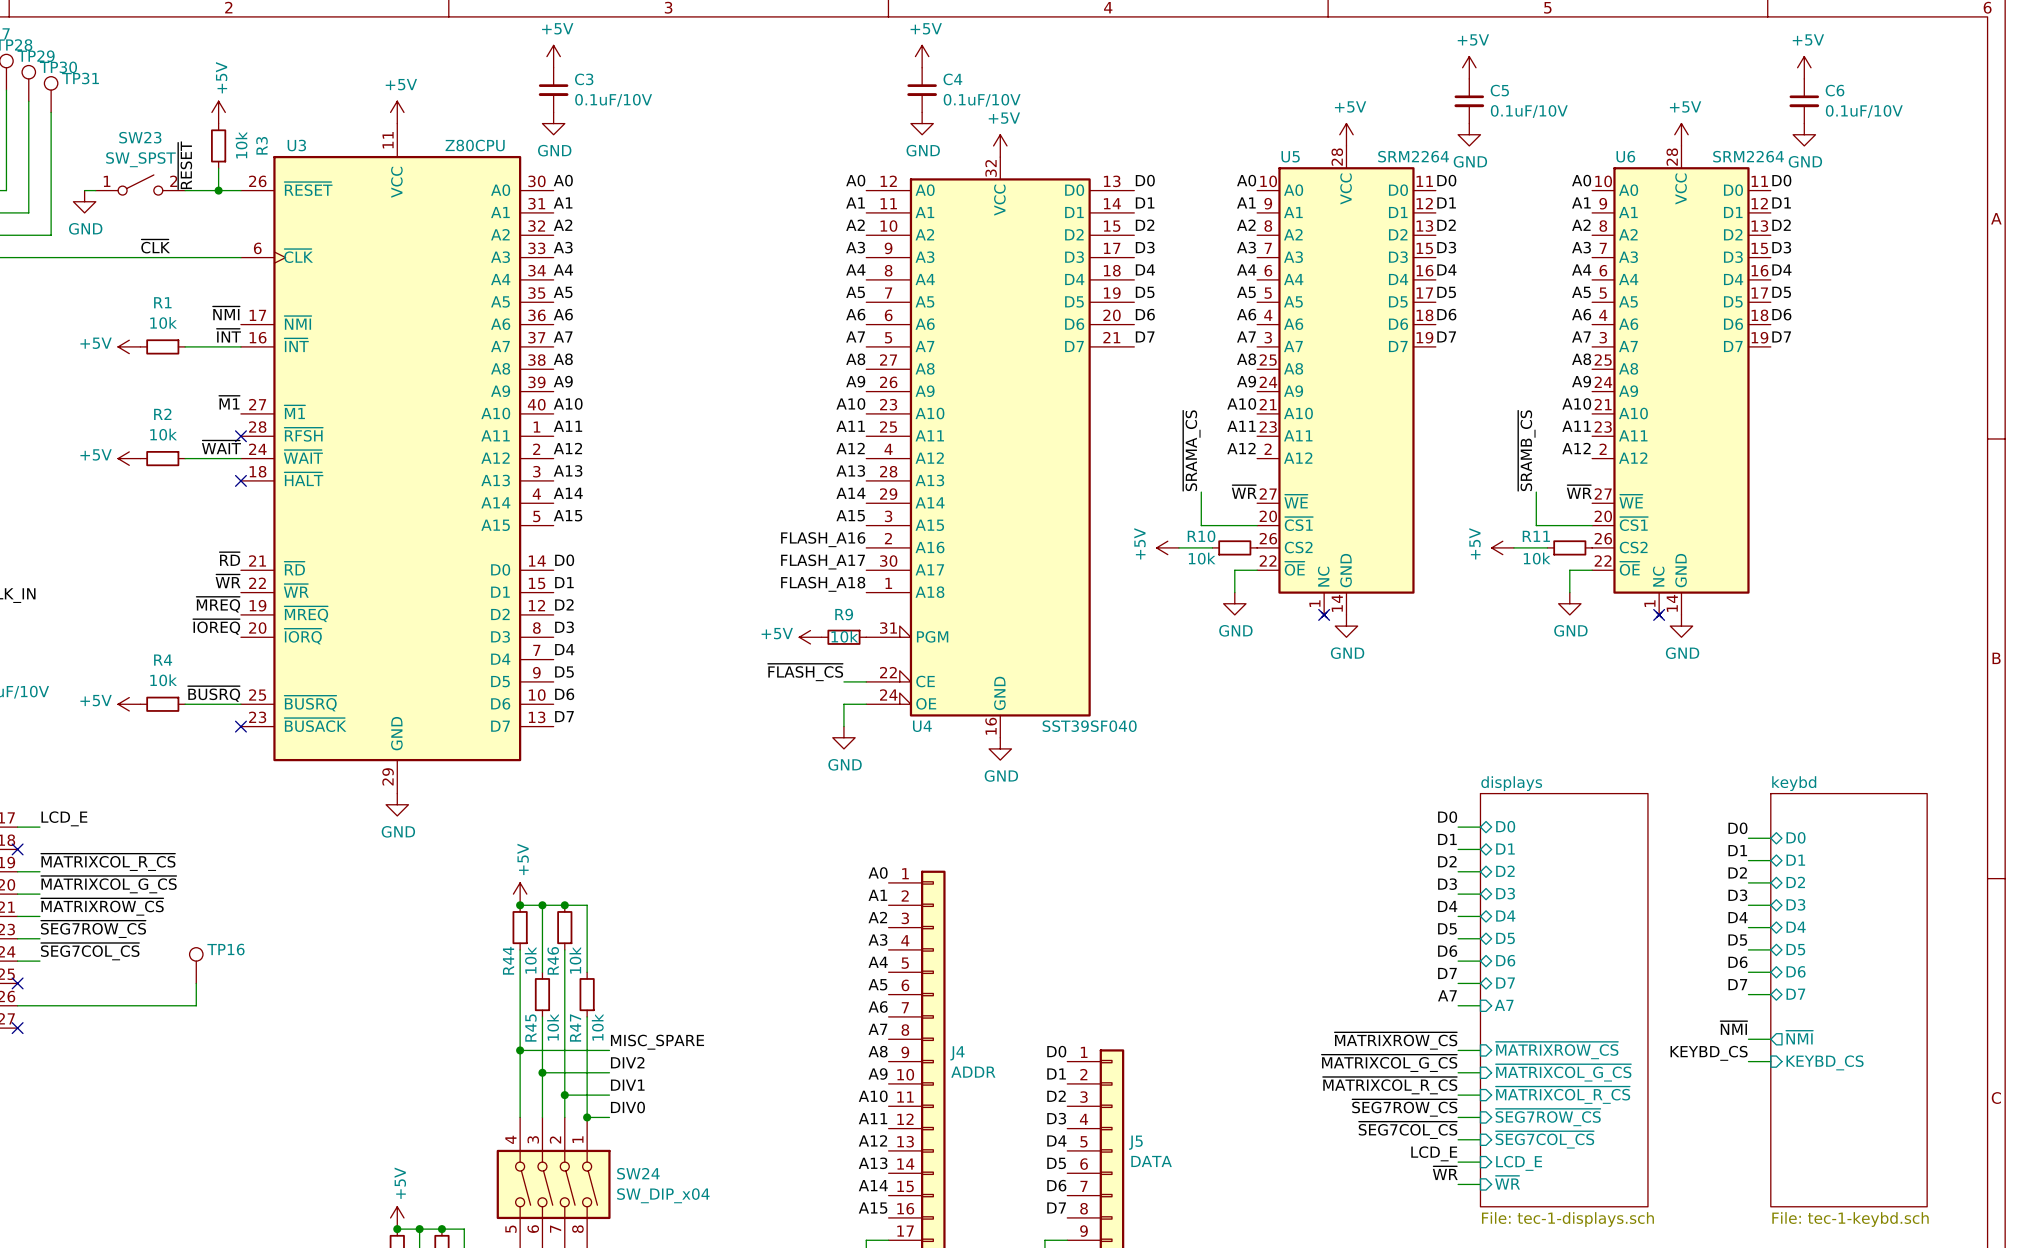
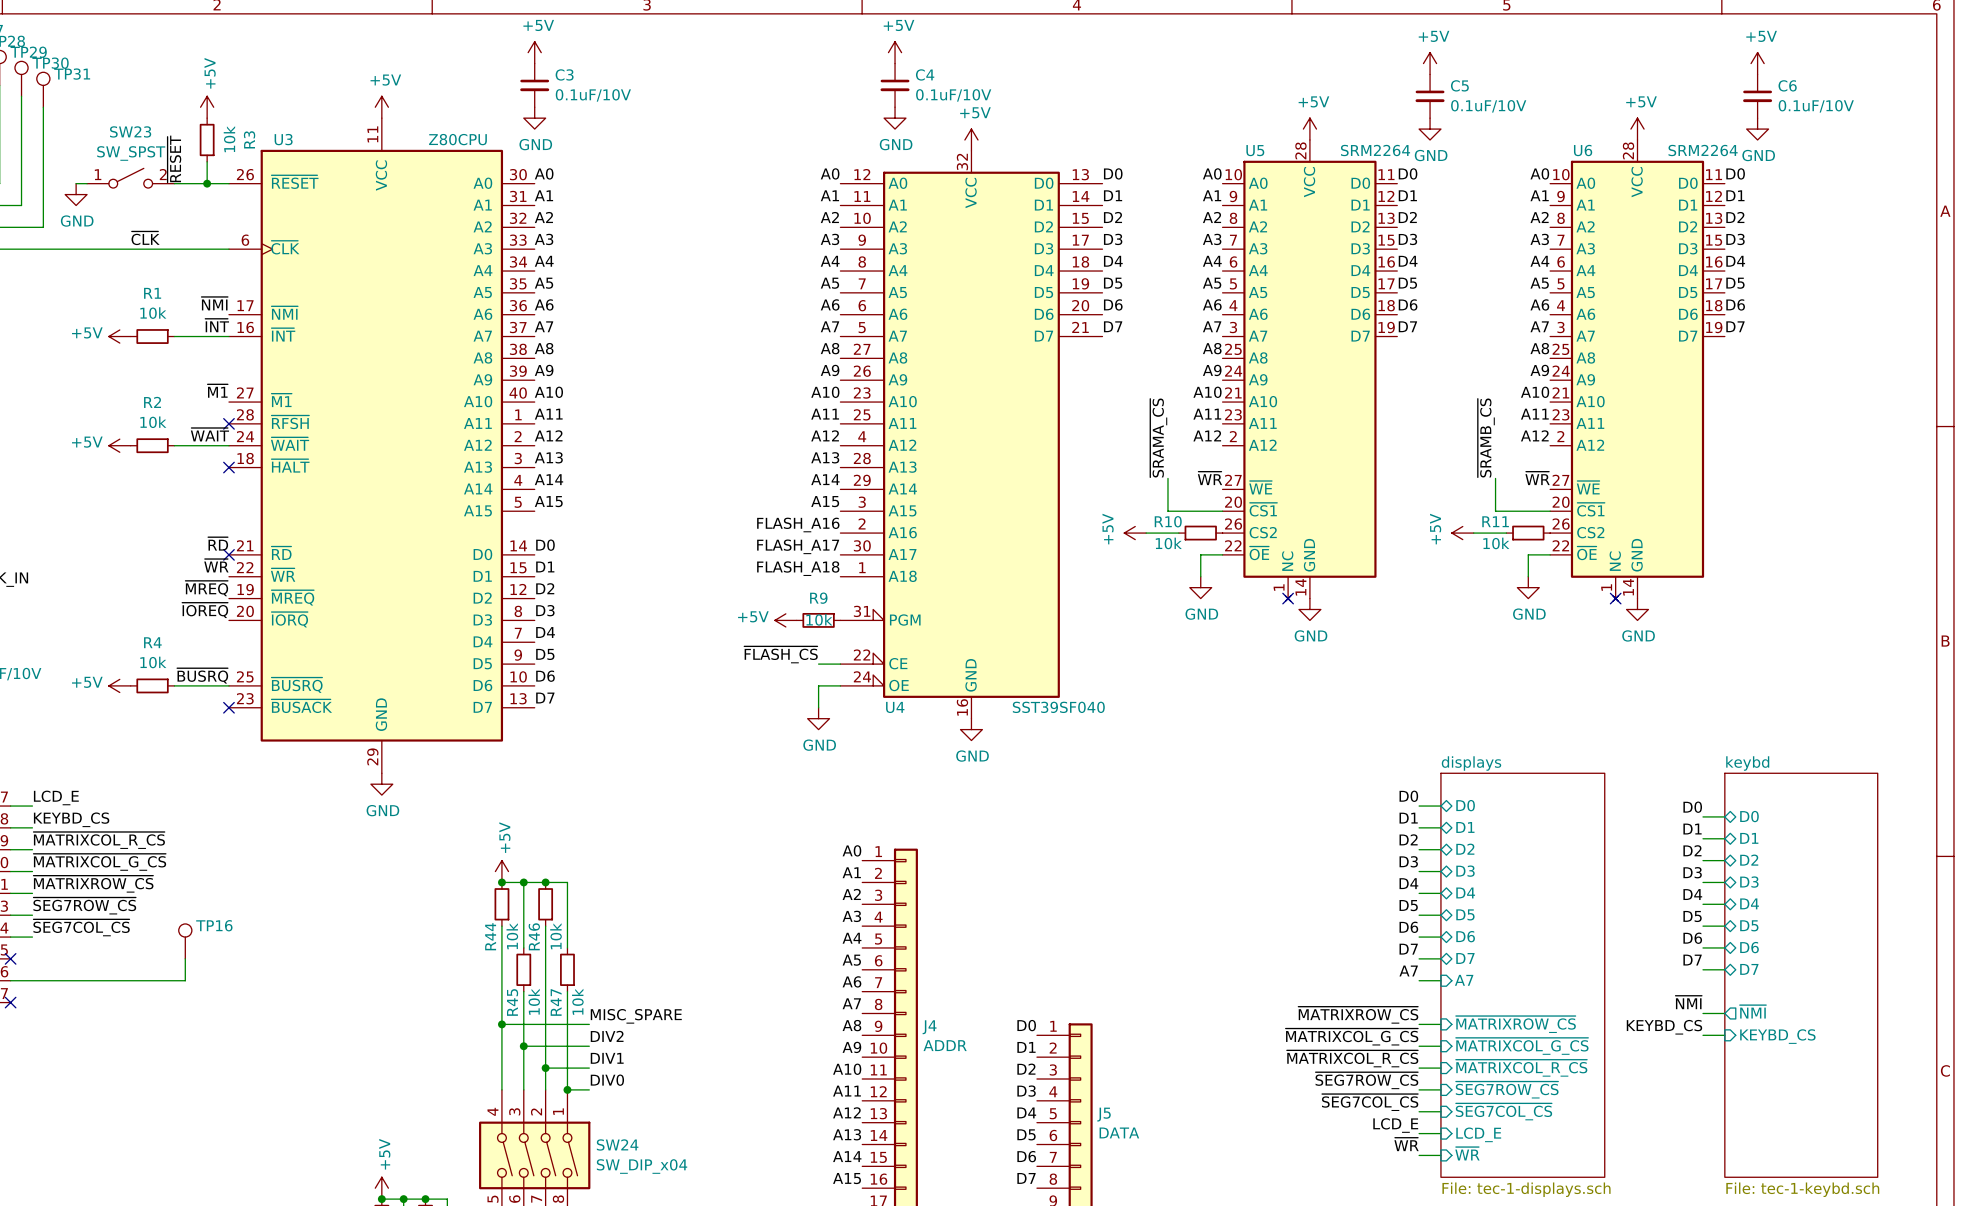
no-connect mark: none -> (228, 554)
label: none -> KEYBD_CS (71, 819)
wire: none -> (10, 827) (32, 827)
no-connect mark: (17, 849) -> none

